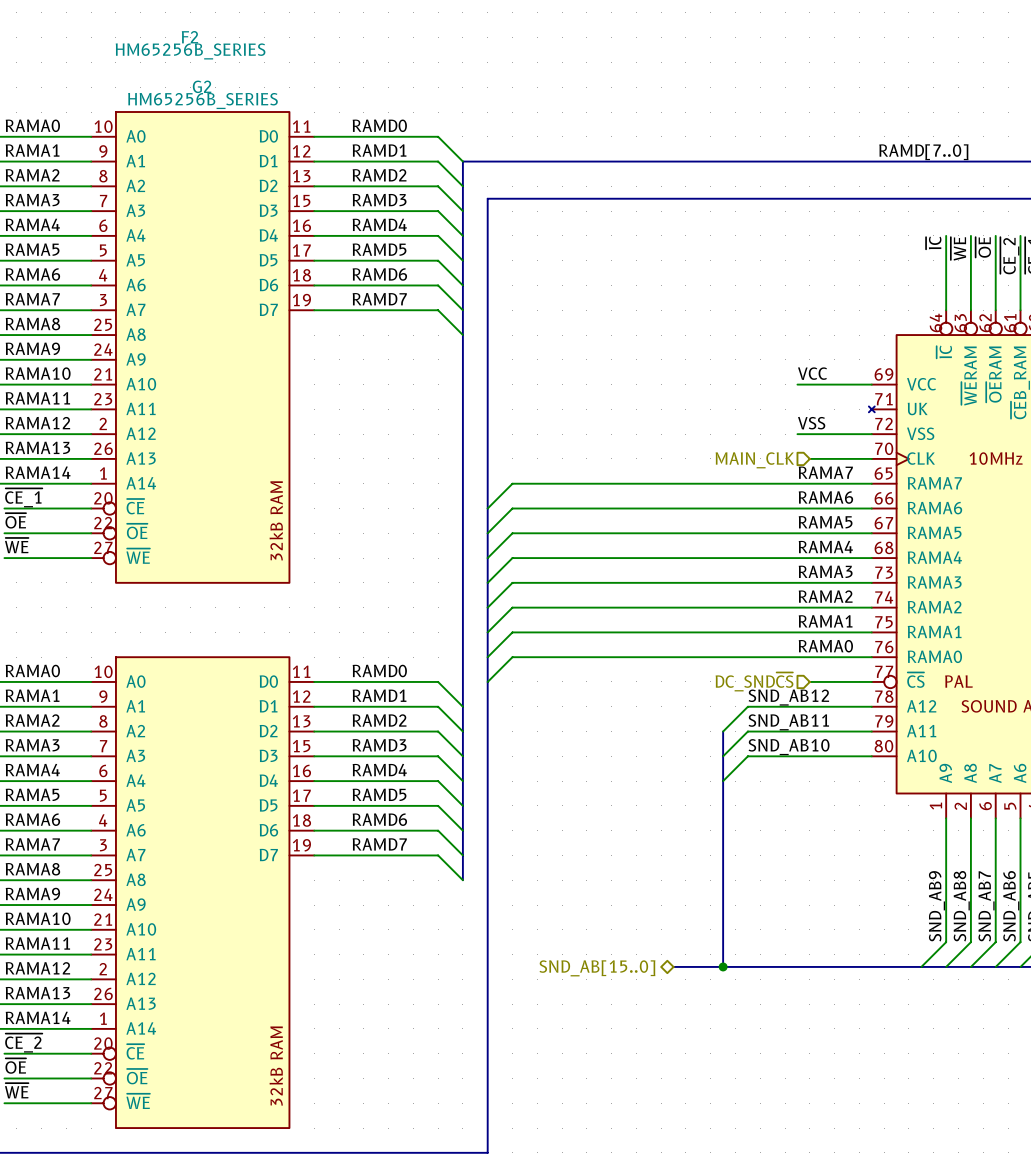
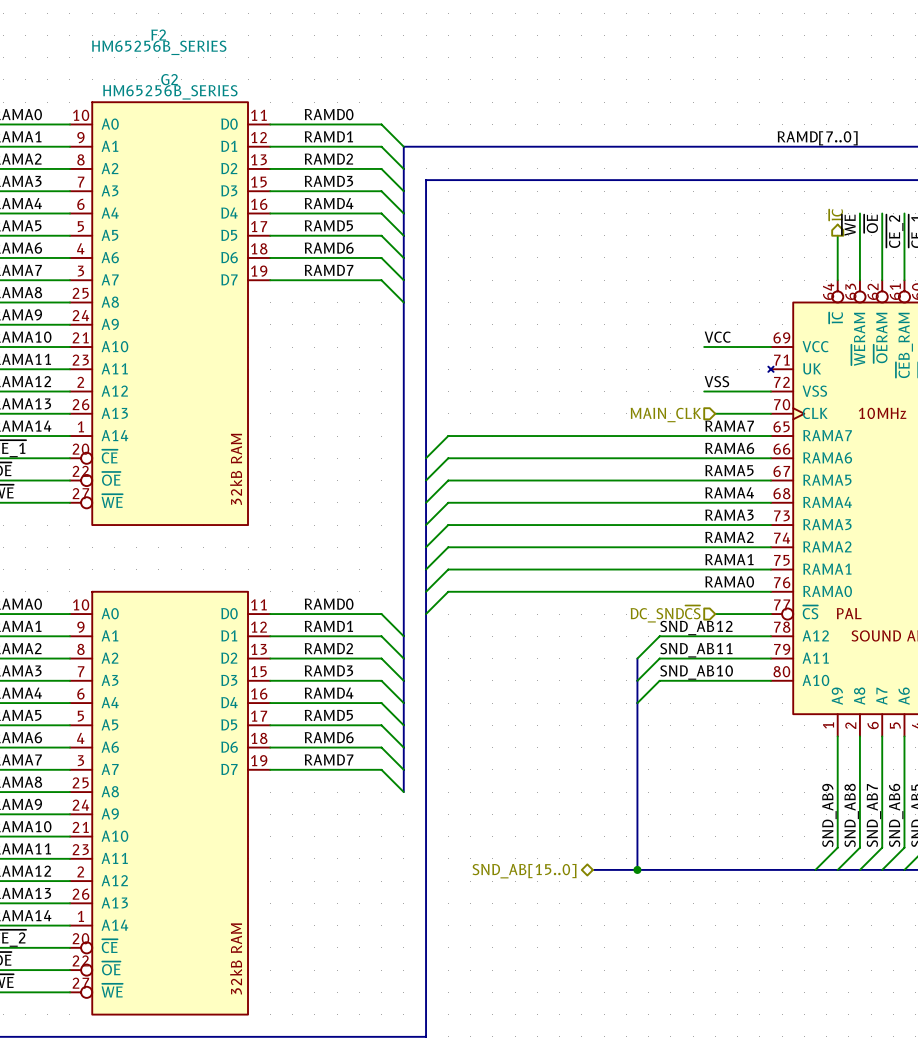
wire: (946, 235) (946, 260) -> none
hierarchical label: none -> ~{IC} (836, 214)
label: ~{IC} (933, 242) -> none

